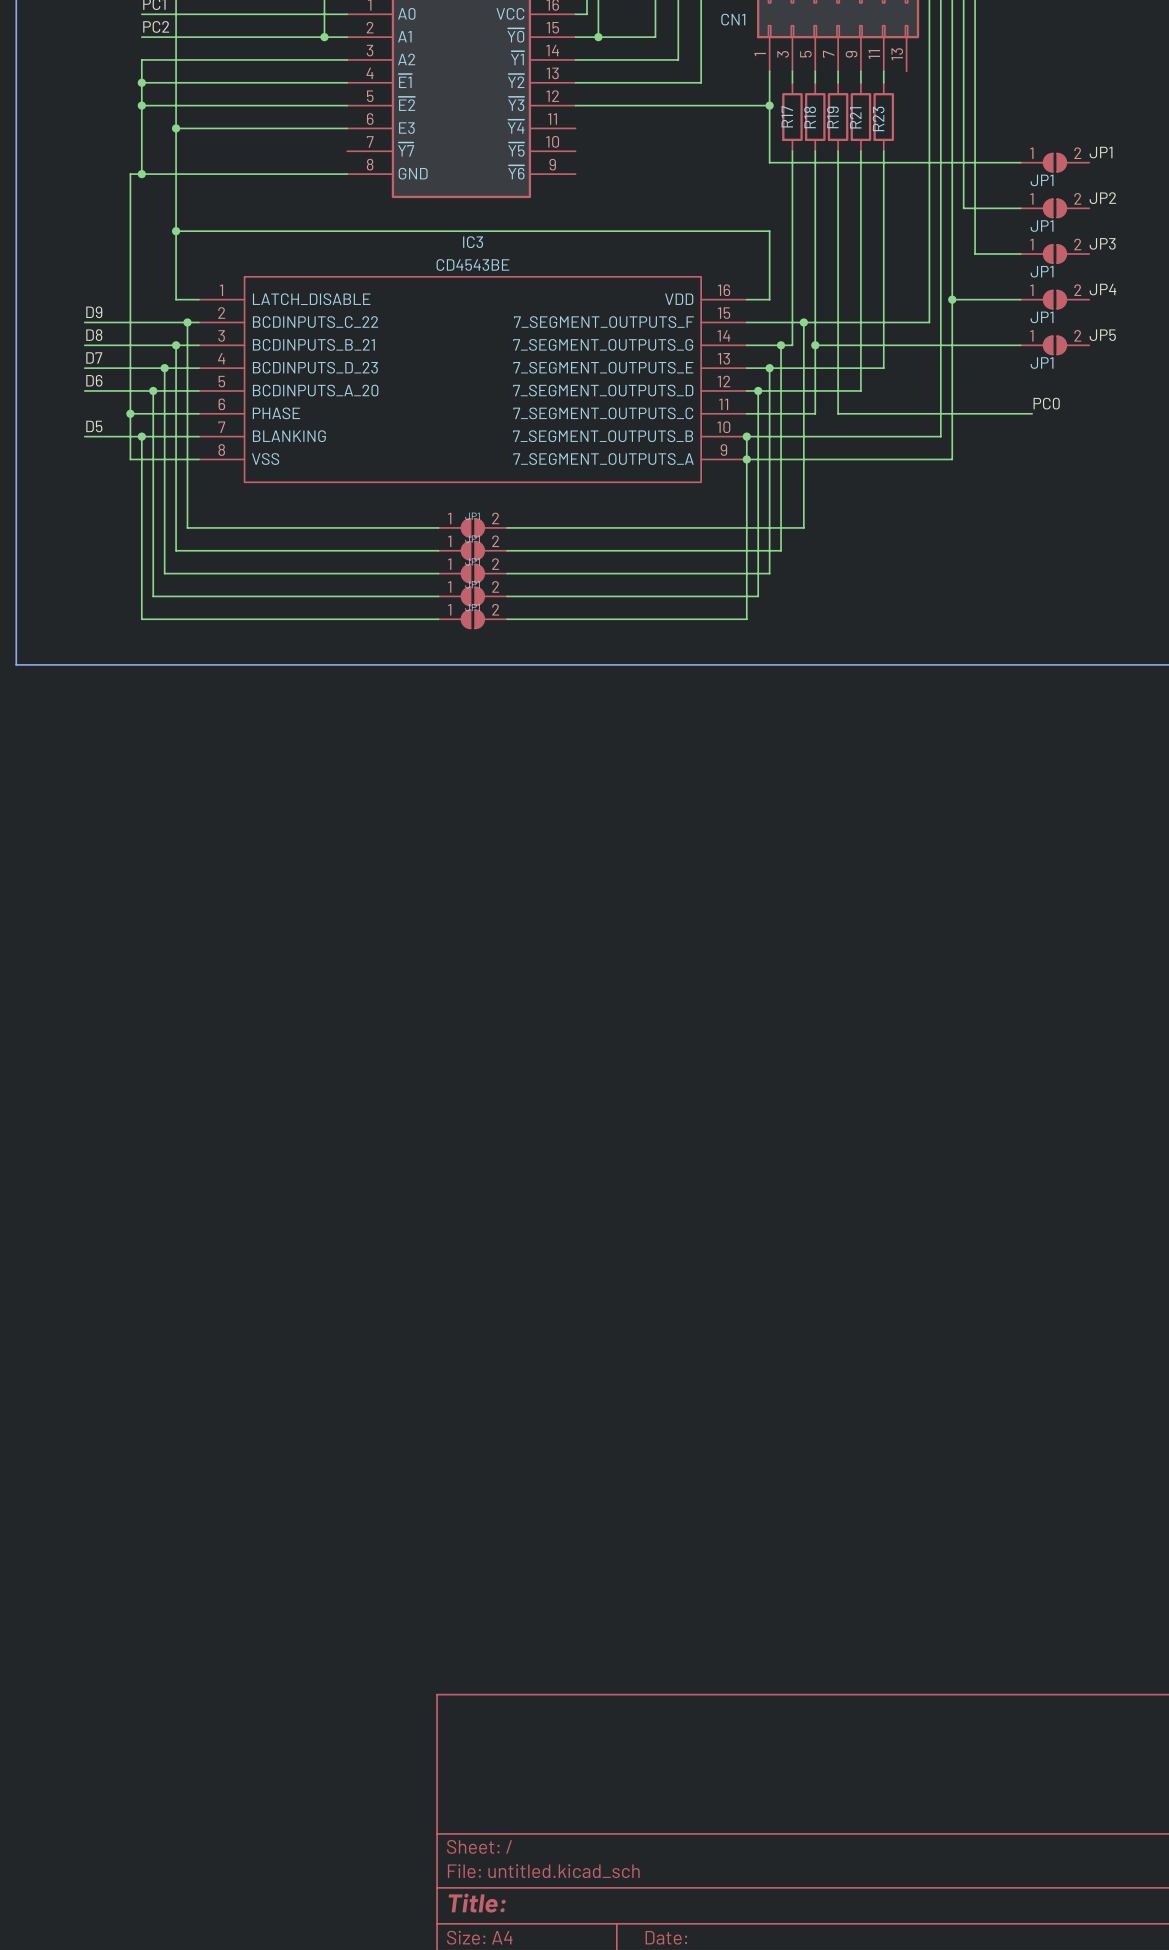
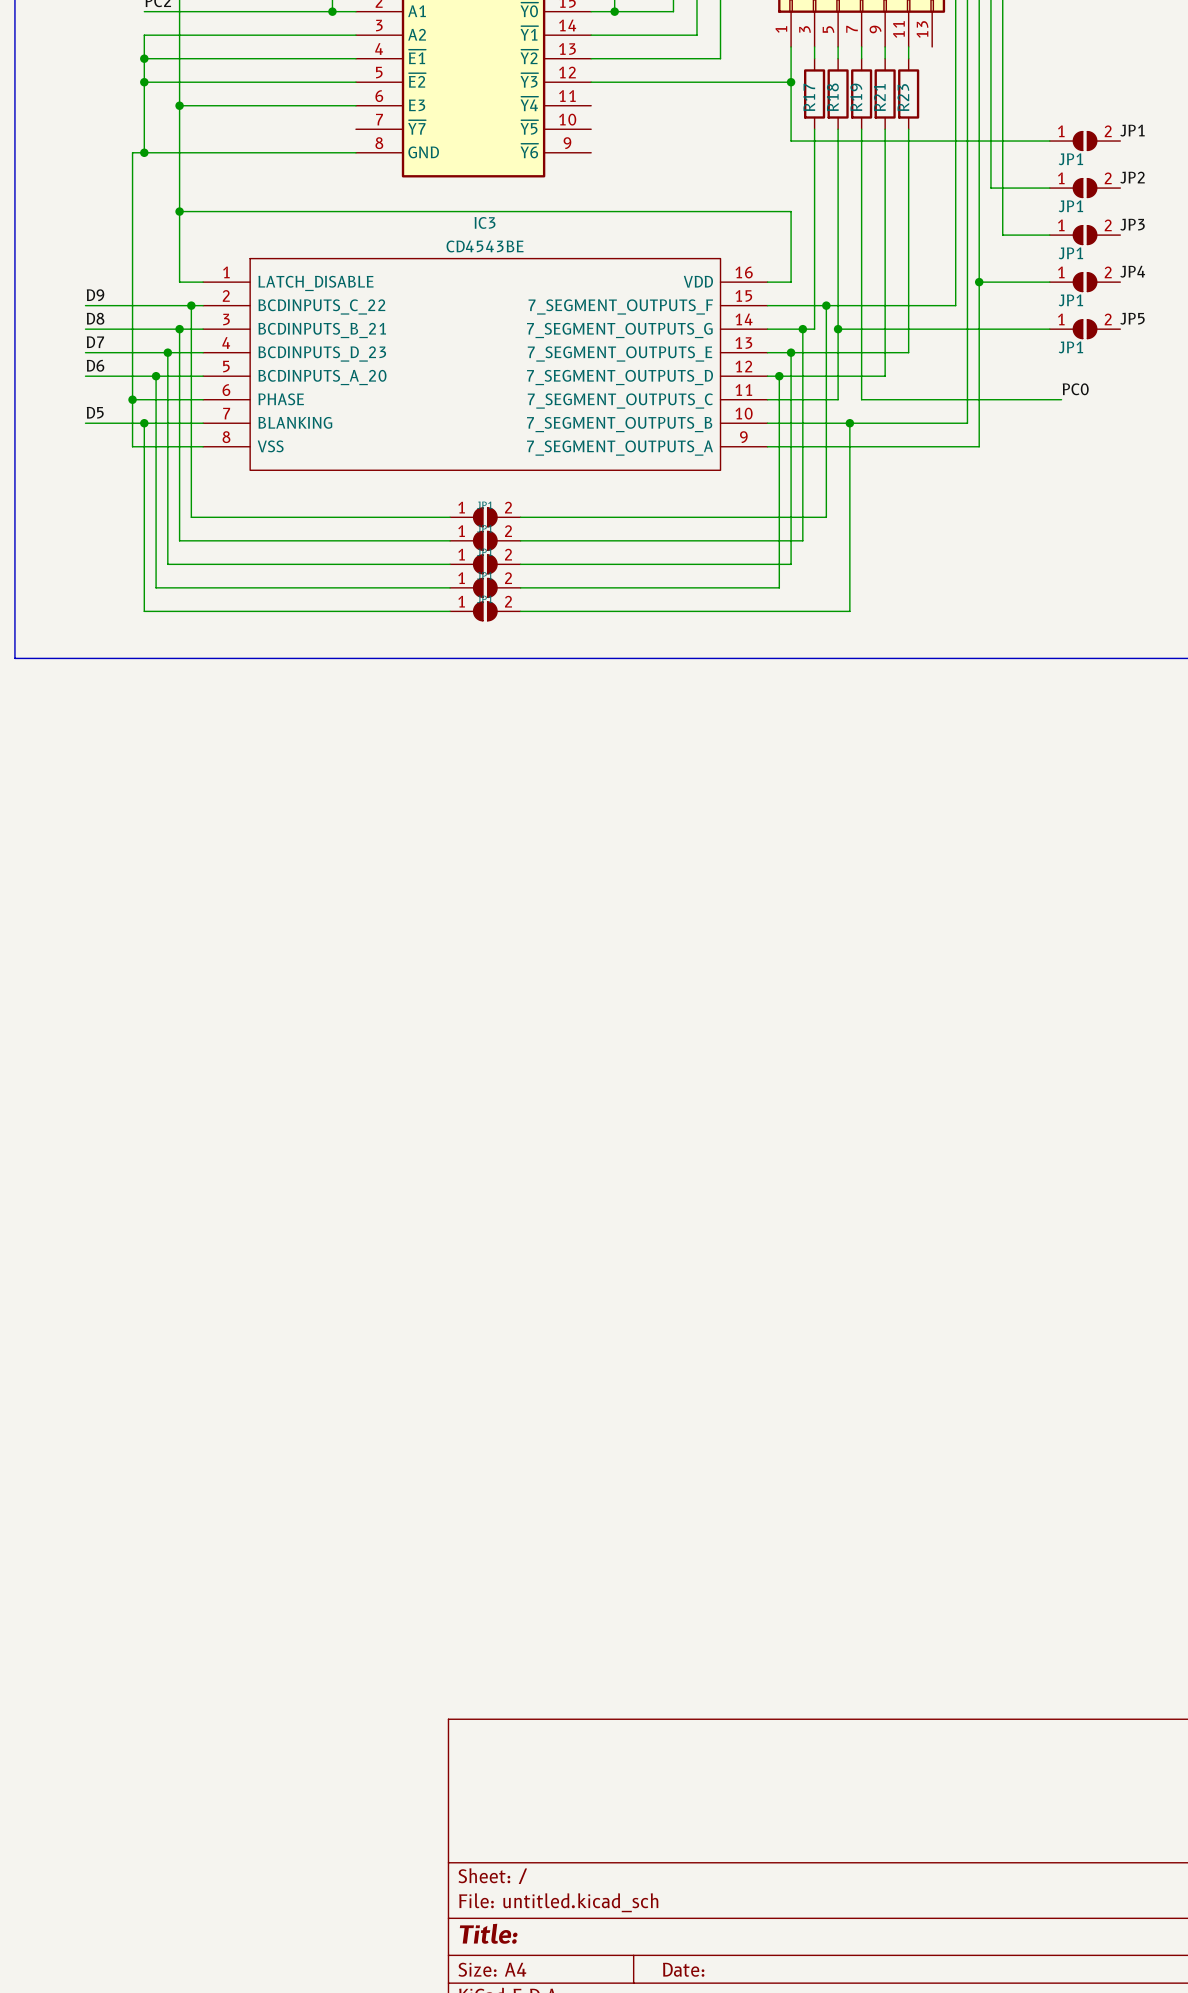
wire: (746, 436) (746, 619) -> (849, 423) (849, 611) (767, 611)
junction: (746, 436) -> none
junction: none -> (849, 423)
junction: (746, 459) -> none

